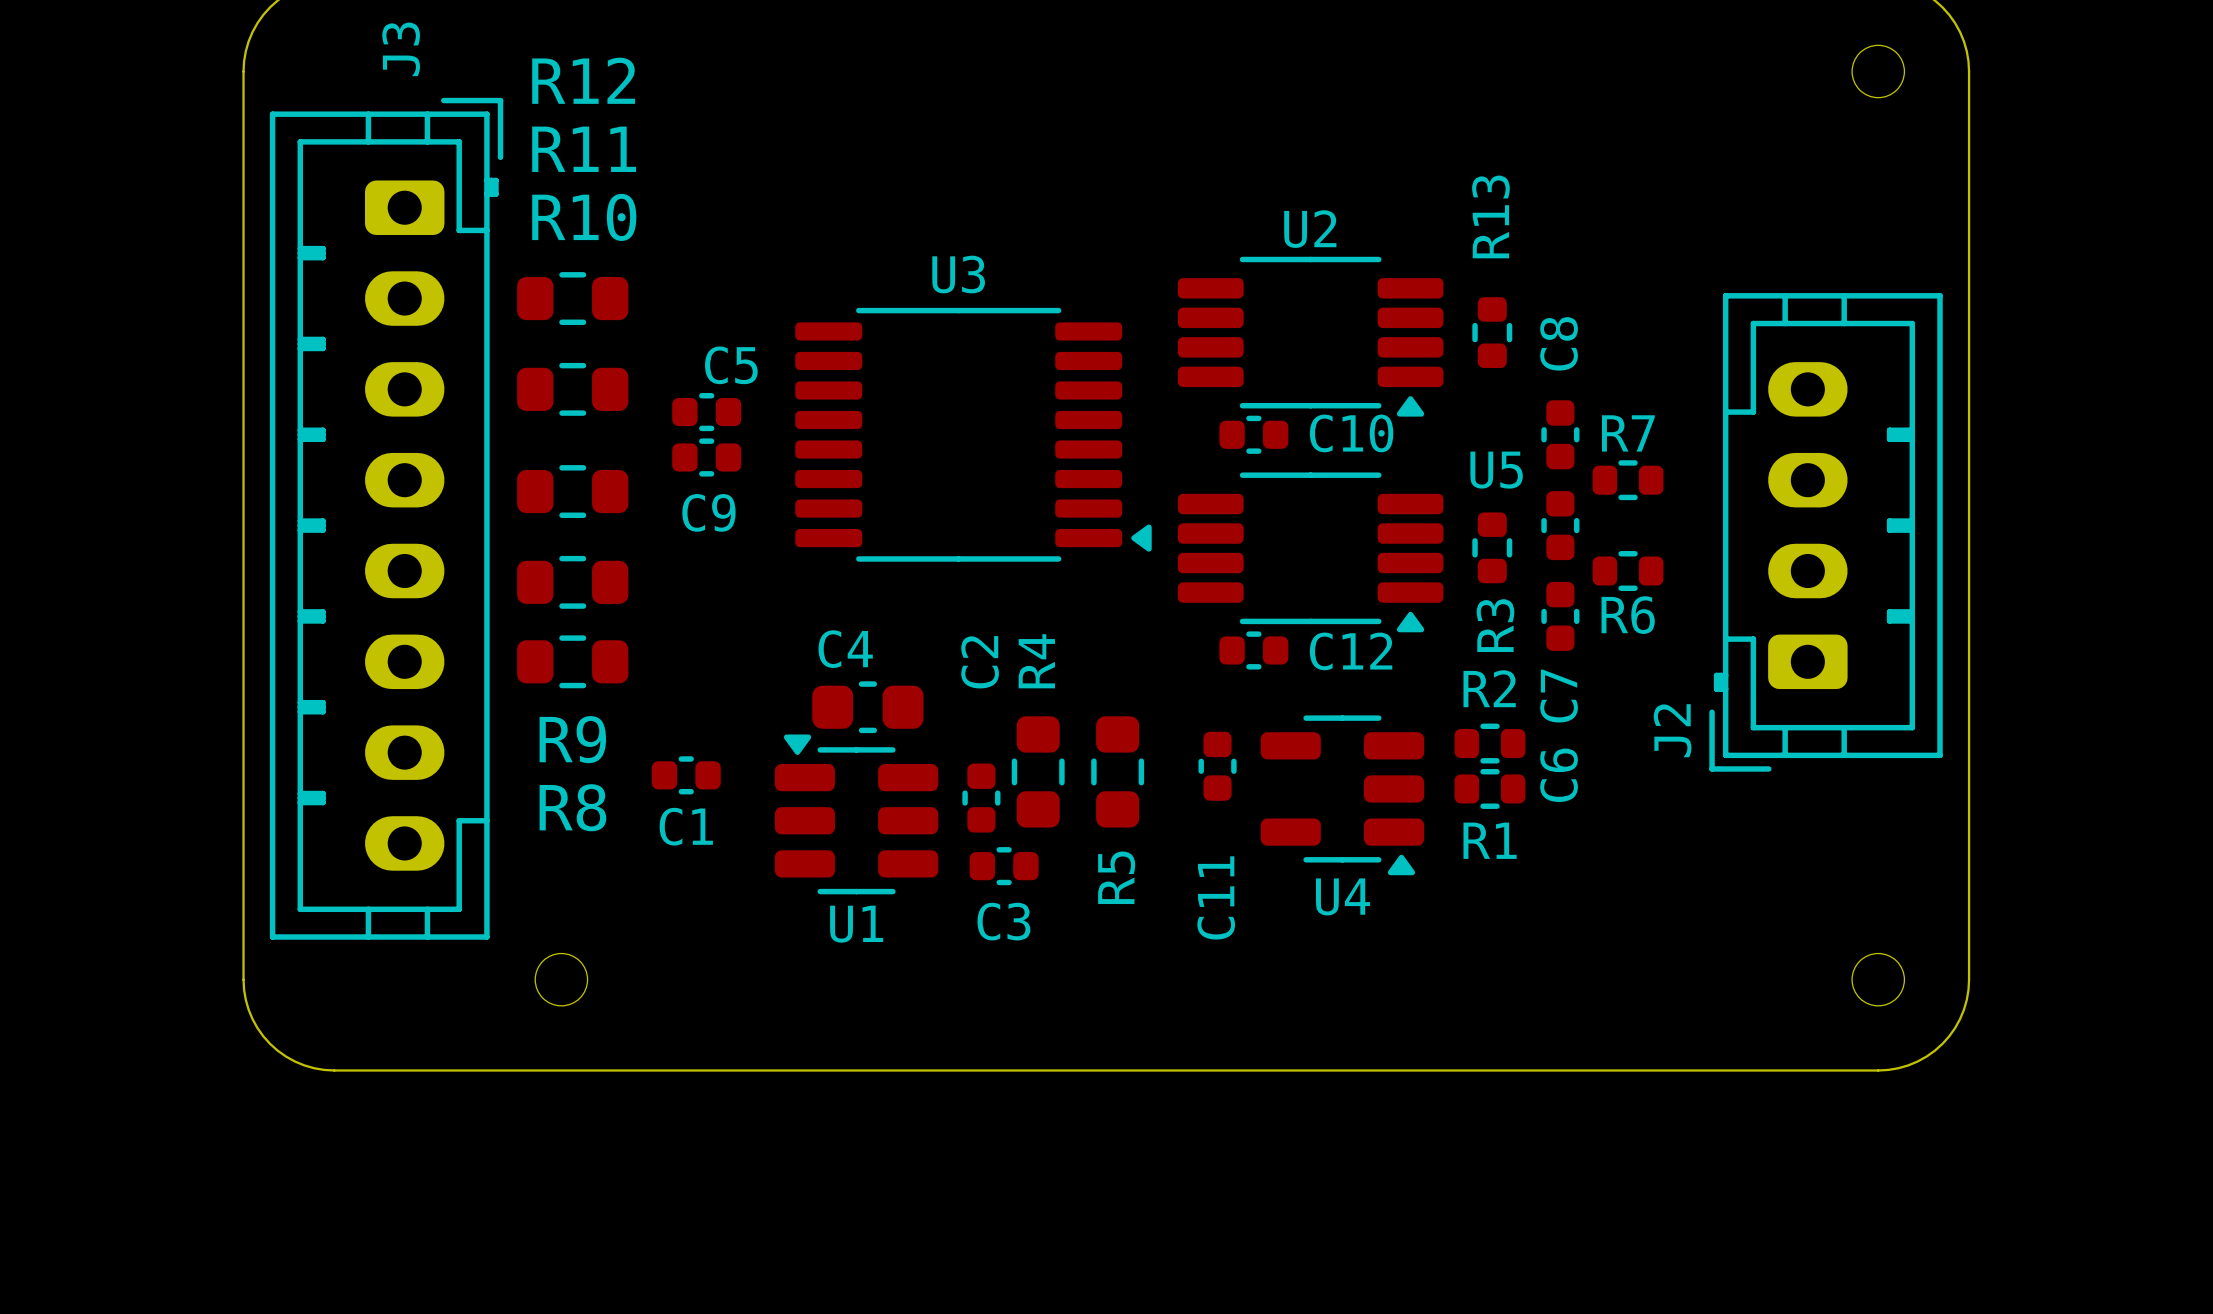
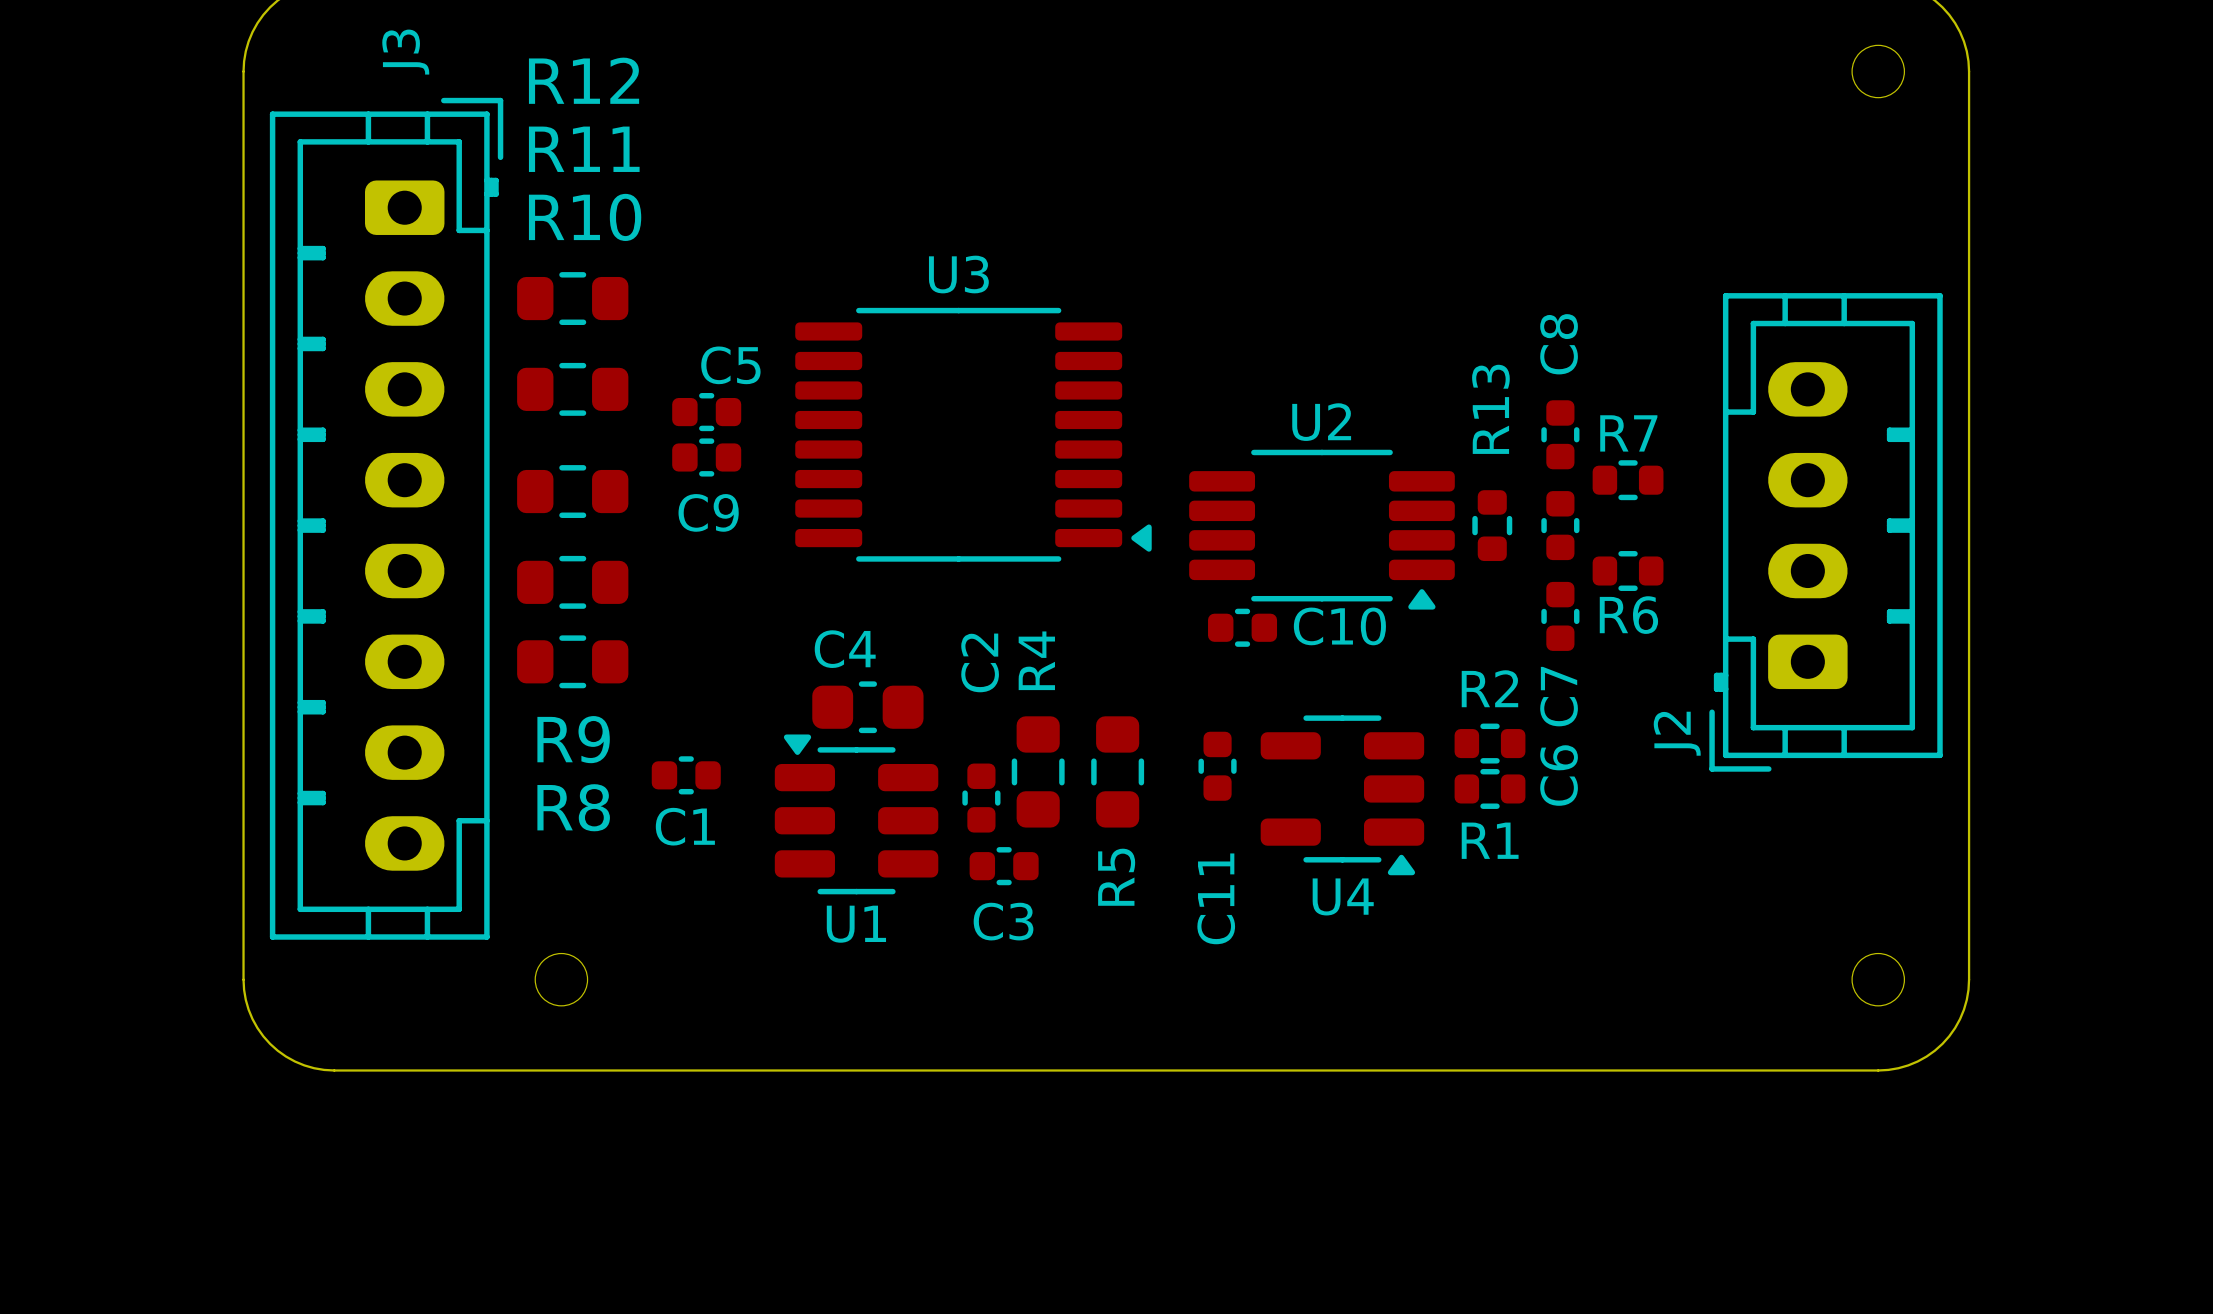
R13 position: (1492, 332) -> (1492, 525)
U2 position: (1310, 336) -> (1321, 529)
C10 position: (1253, 434) -> (1242, 627)
R3: (1492, 547) -> none
U5: (1310, 552) -> none
C12: (1253, 650) -> none

